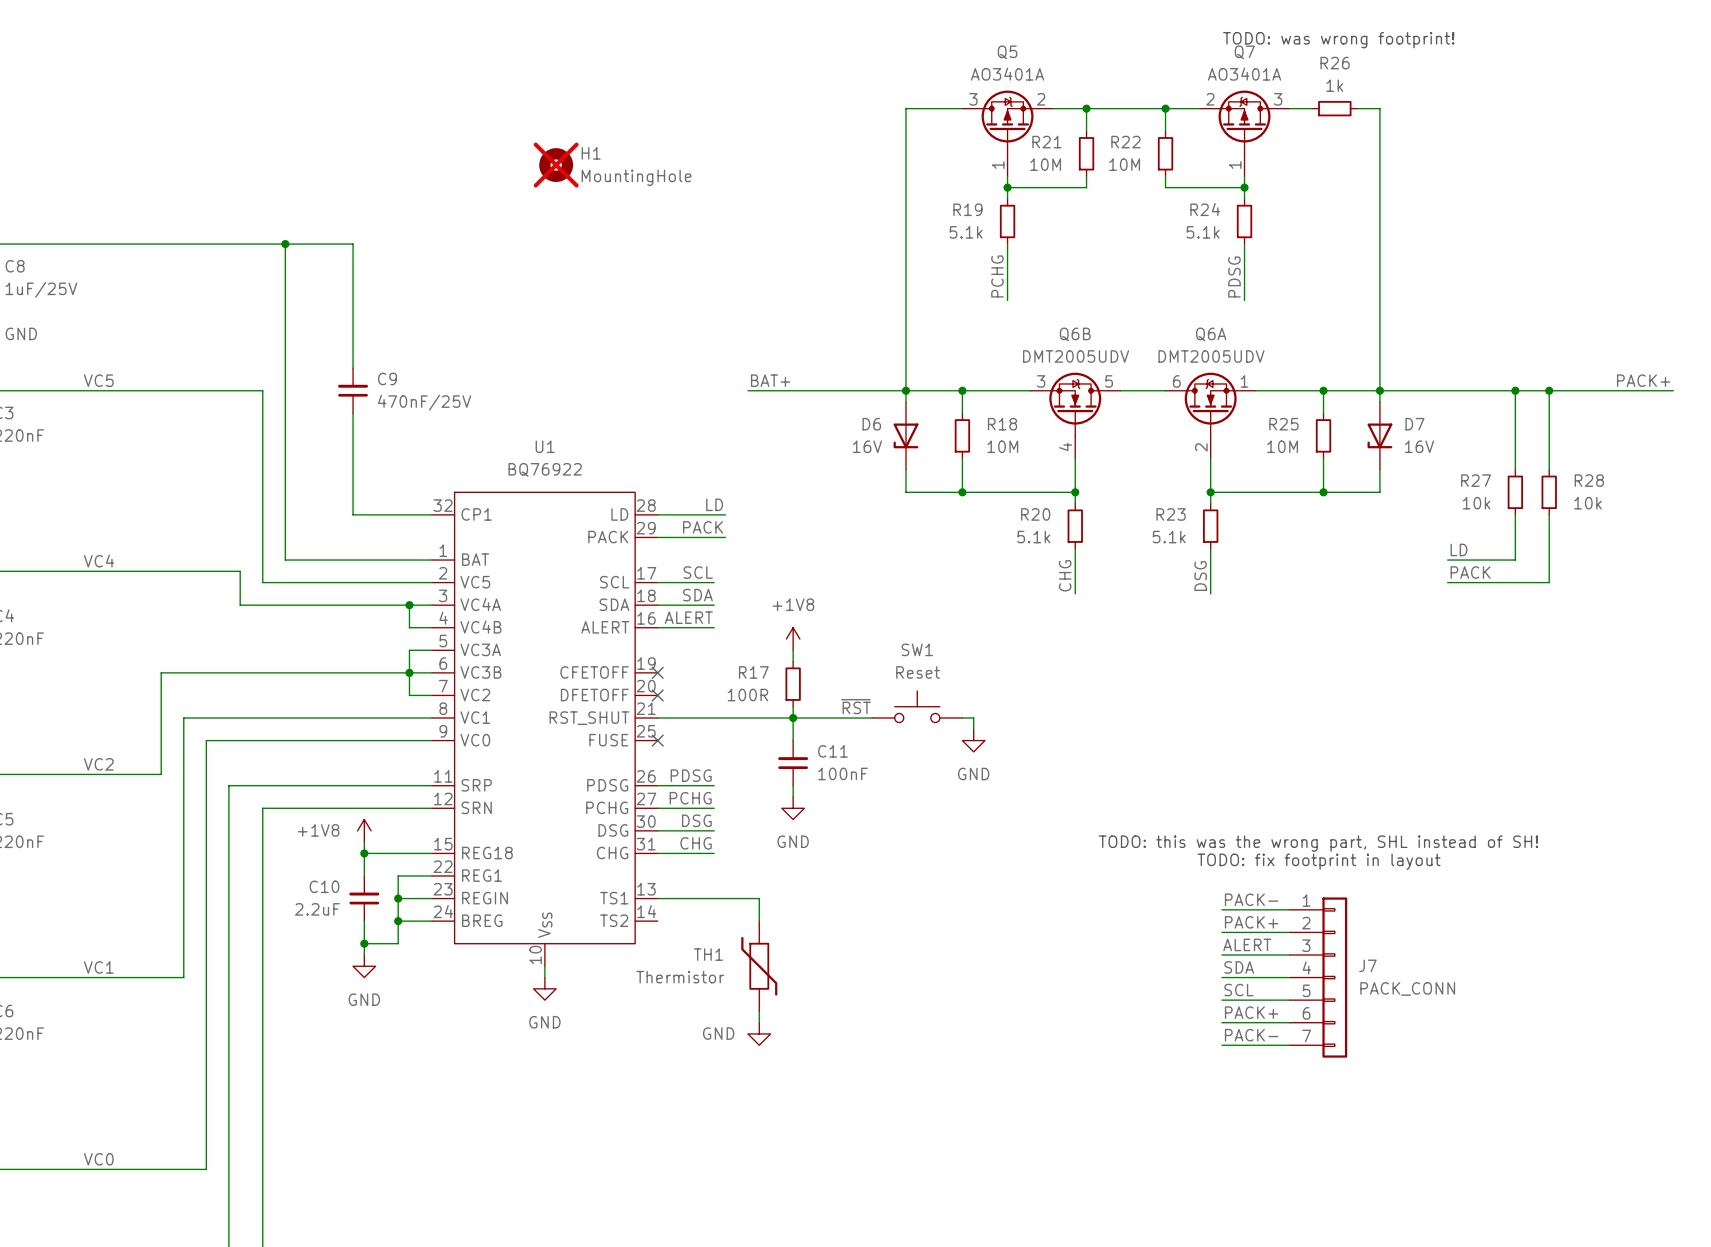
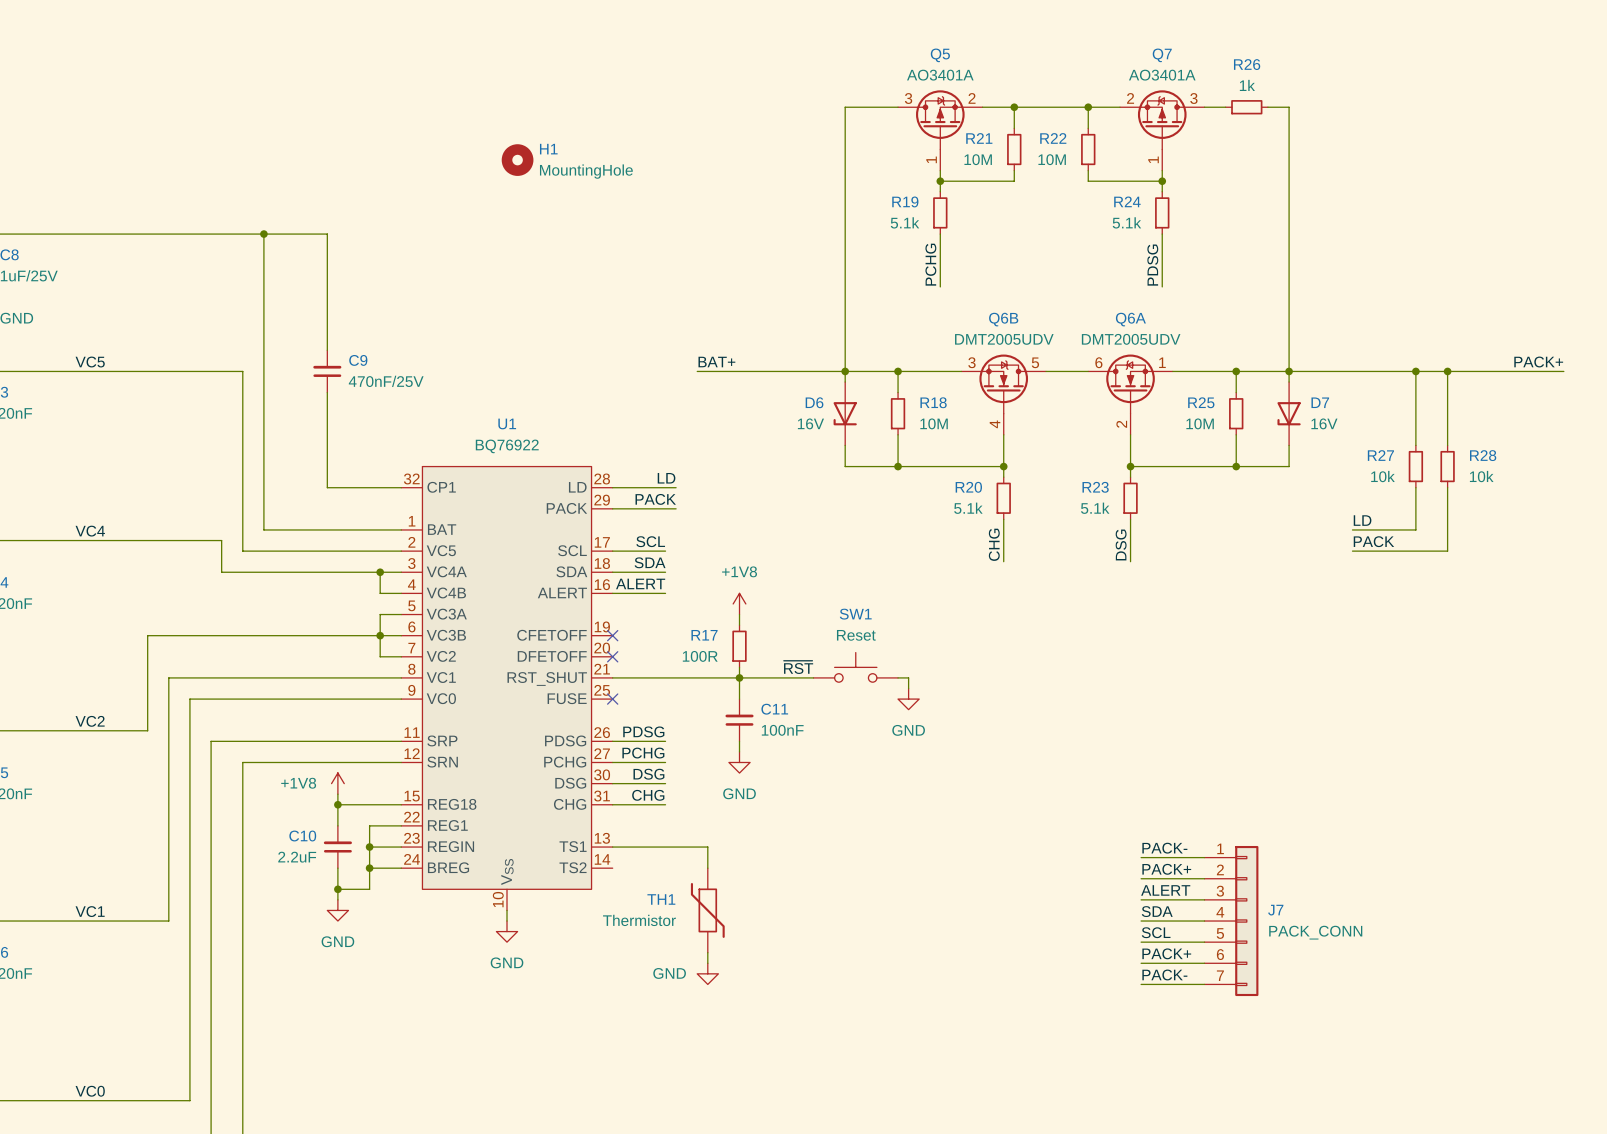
text: TODO: was wrong footprint! (1338, 40) -> none
H1 do-not-place cross: (556, 165) -> none
text: TODO: this was the wrong part, SHL instead of SH! (1318, 843) -> none
text: TODO: fix footprint in layout (1319, 861) -> none

